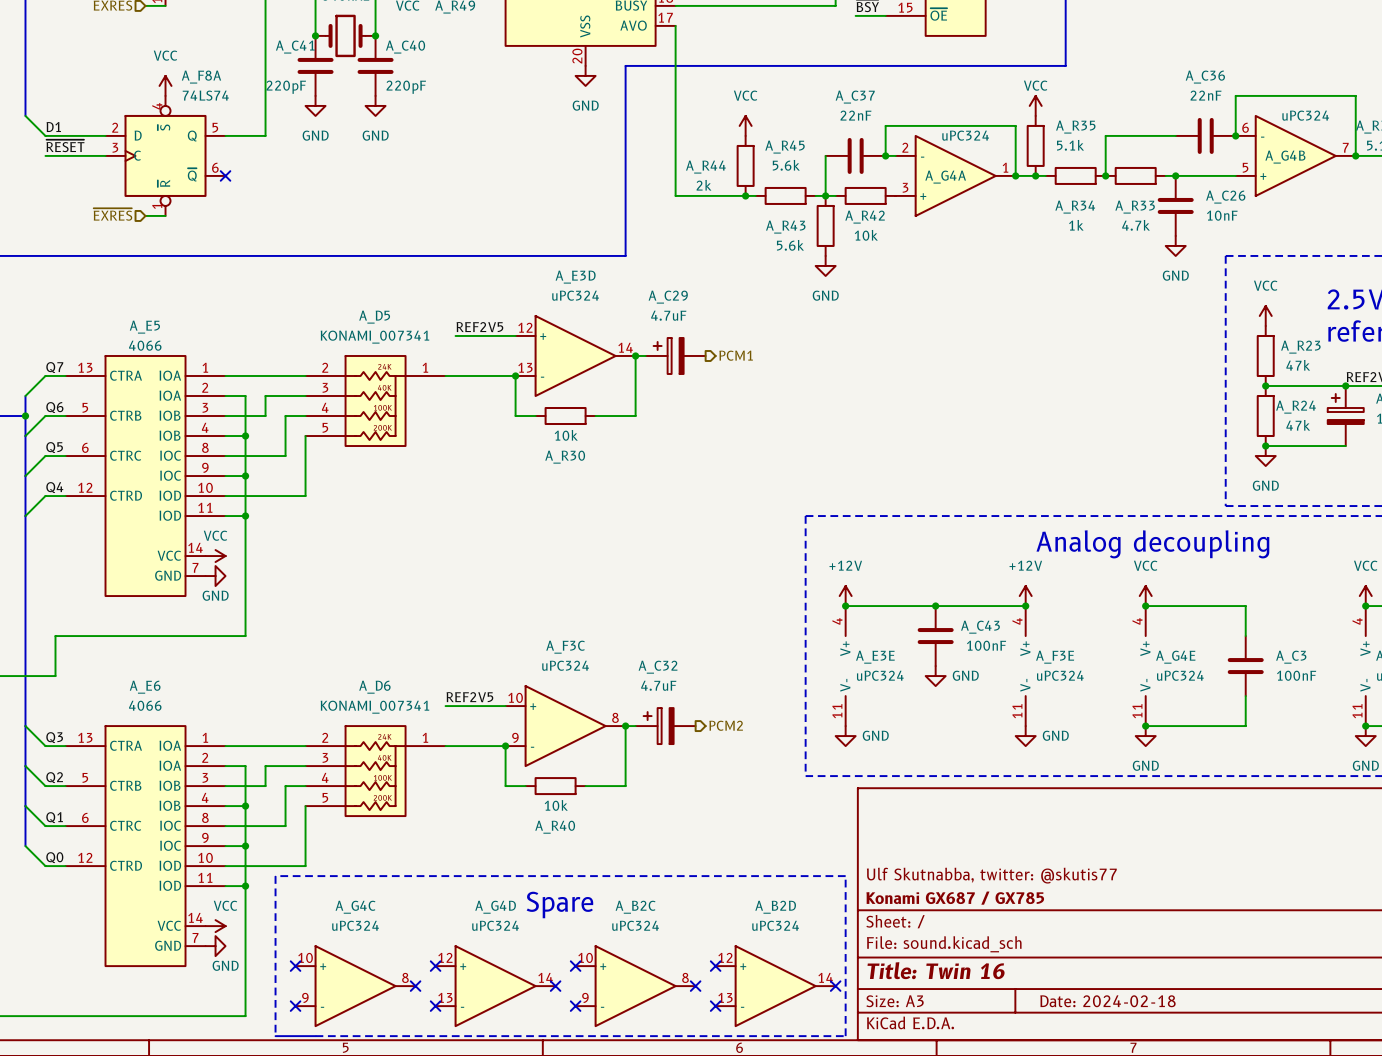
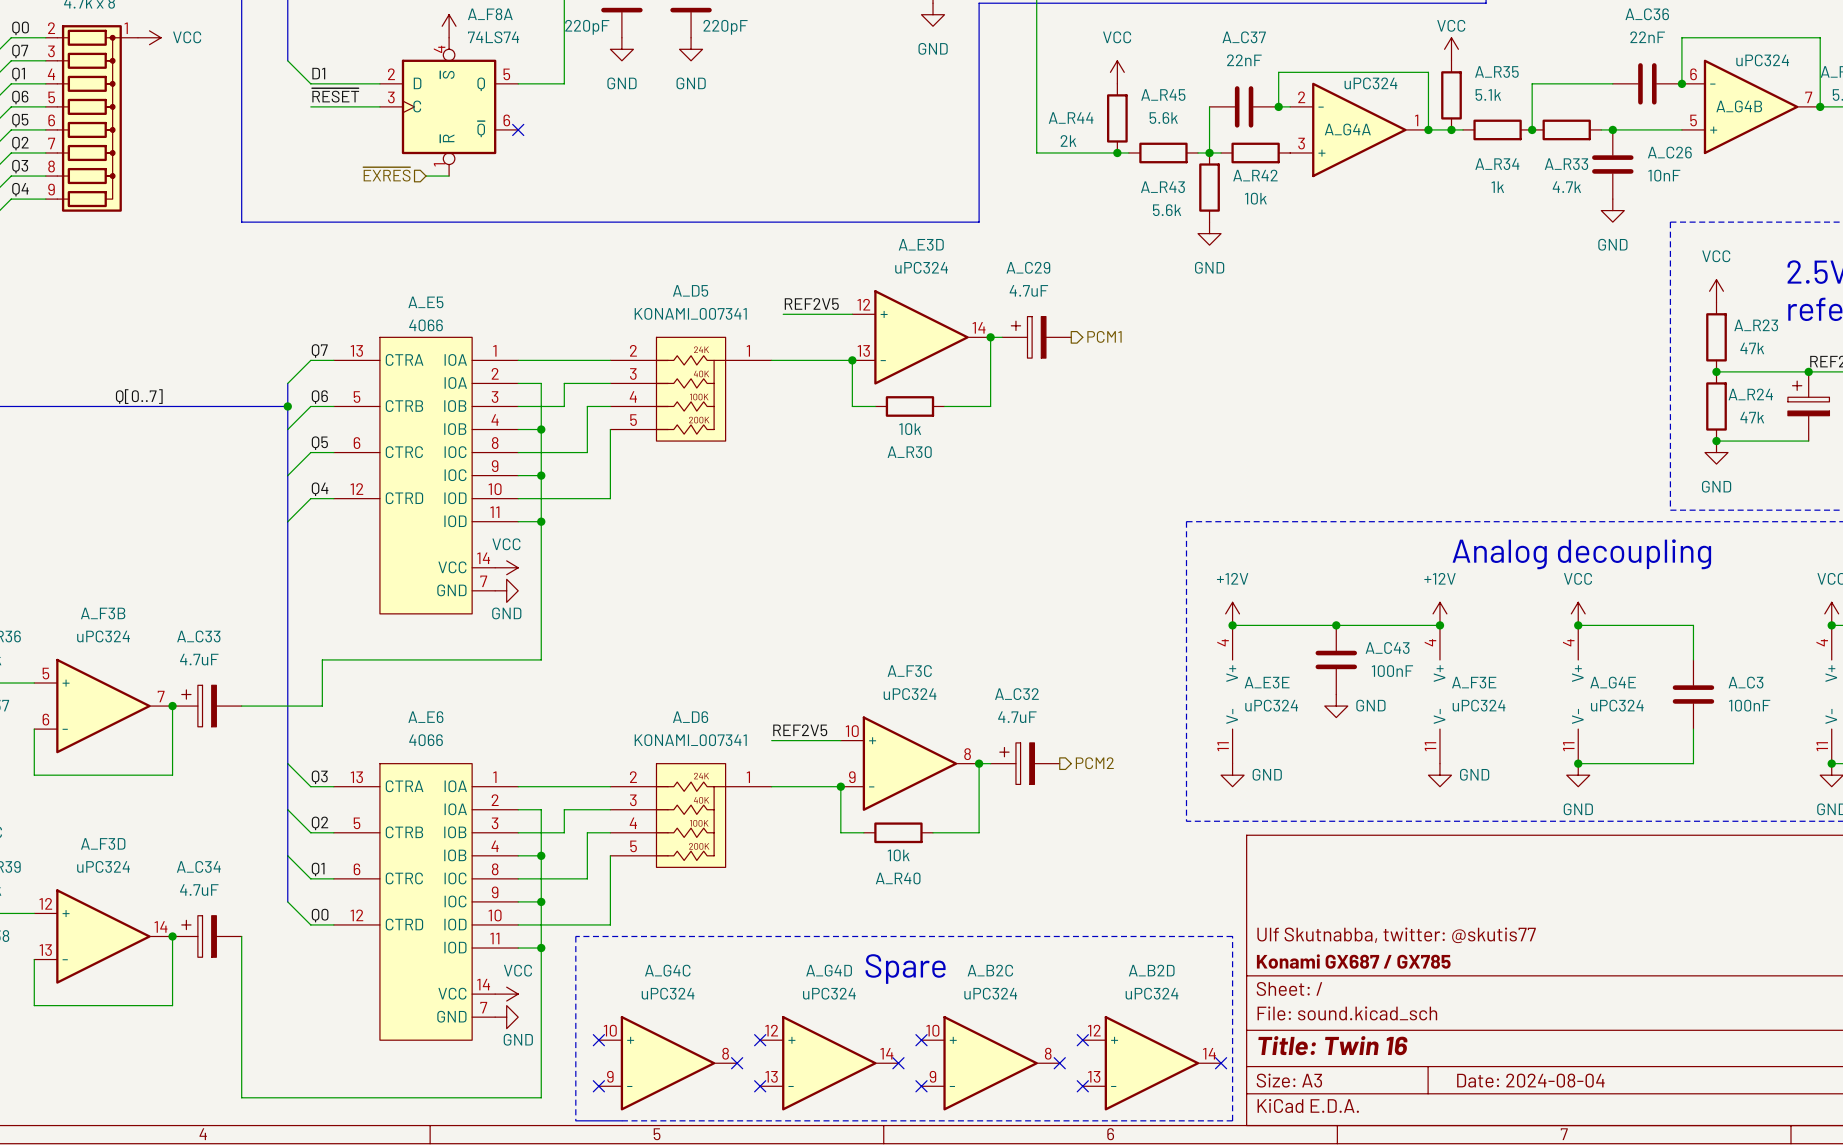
title block: Date: 2024-02-18 (1107, 1001) -> Date: 2024-08-04 (1530, 1080)

